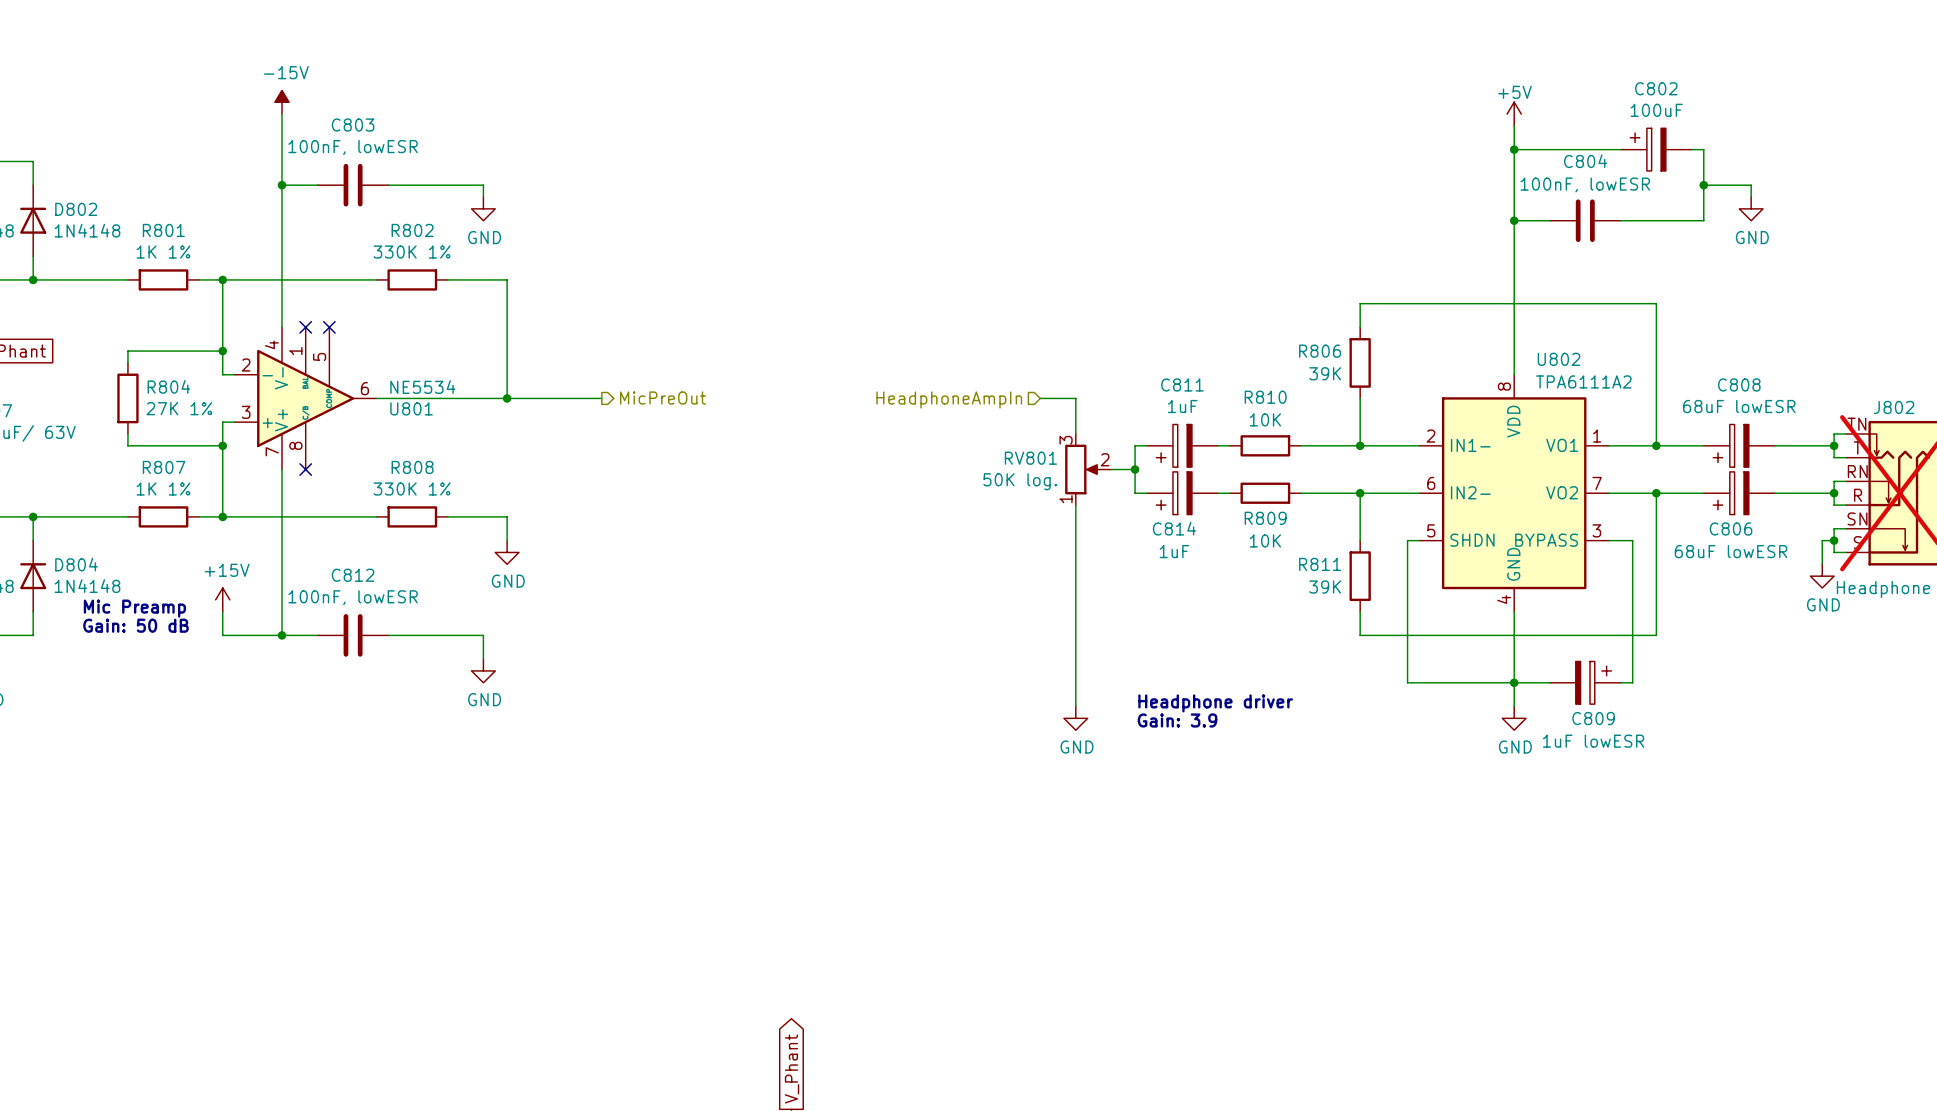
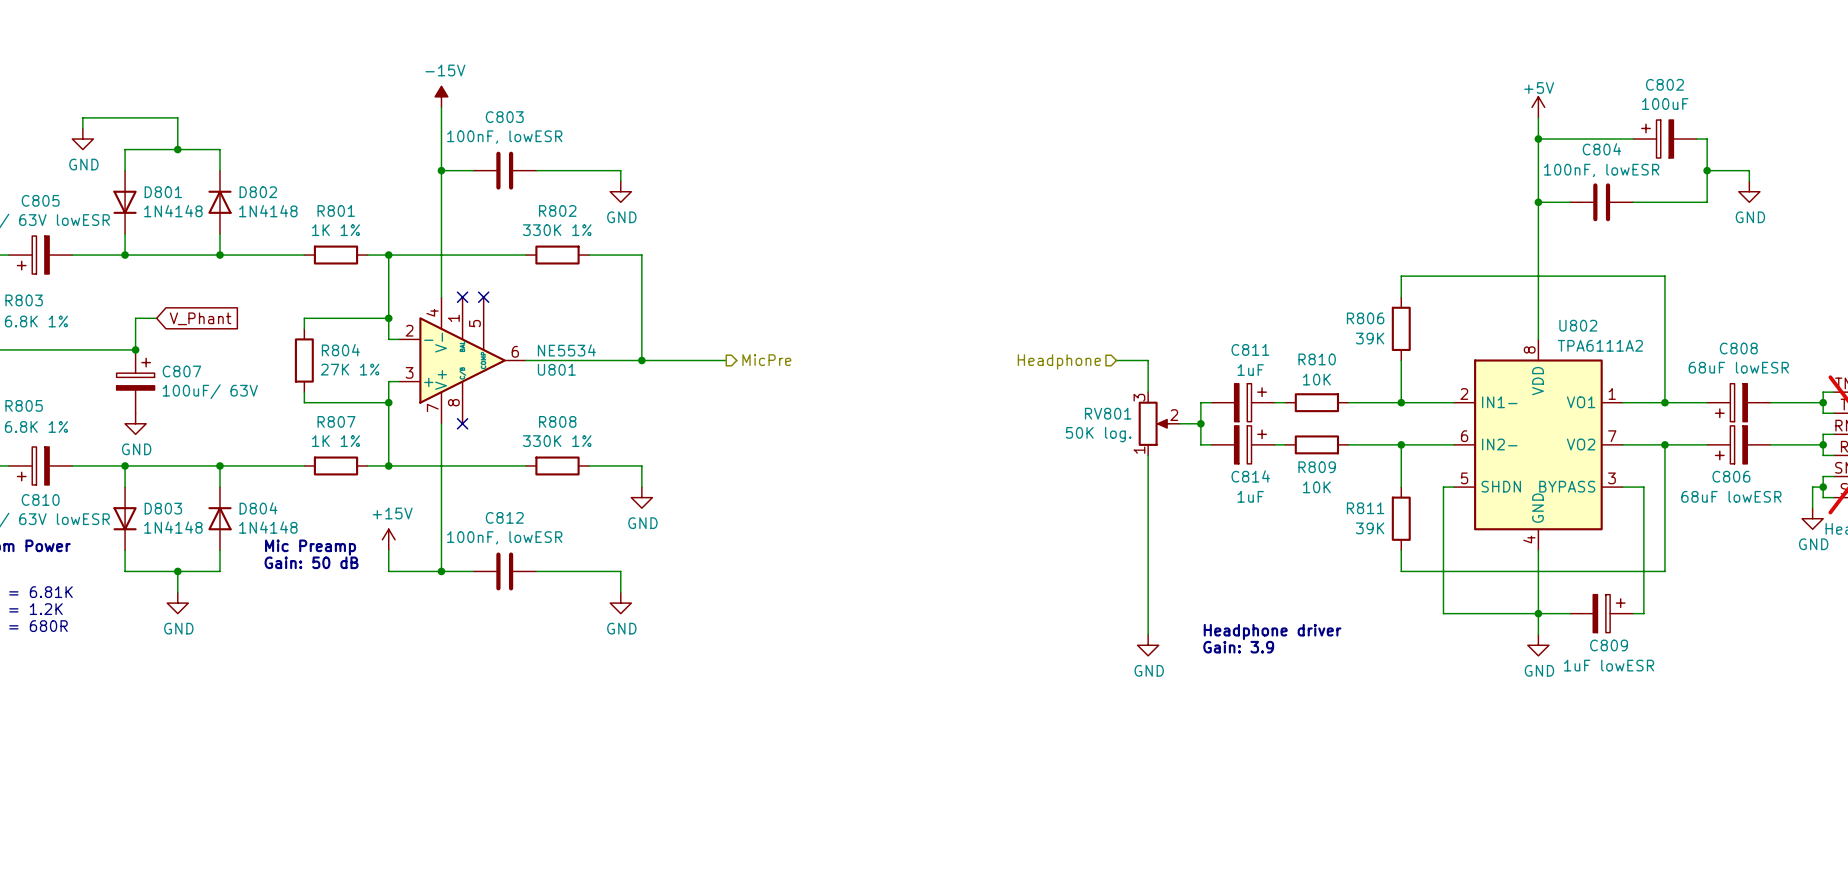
hierarchical label: MicPreOut (663, 398) -> MicPre (766, 360)
hierarchical label: HeadphoneAmpIn (949, 399) -> Headphone (1059, 361)
C811 rotation: 0° (1174, 445) -> 180° (1250, 402)
C814 rotation: 0° (1174, 493) -> 180° (1250, 444)

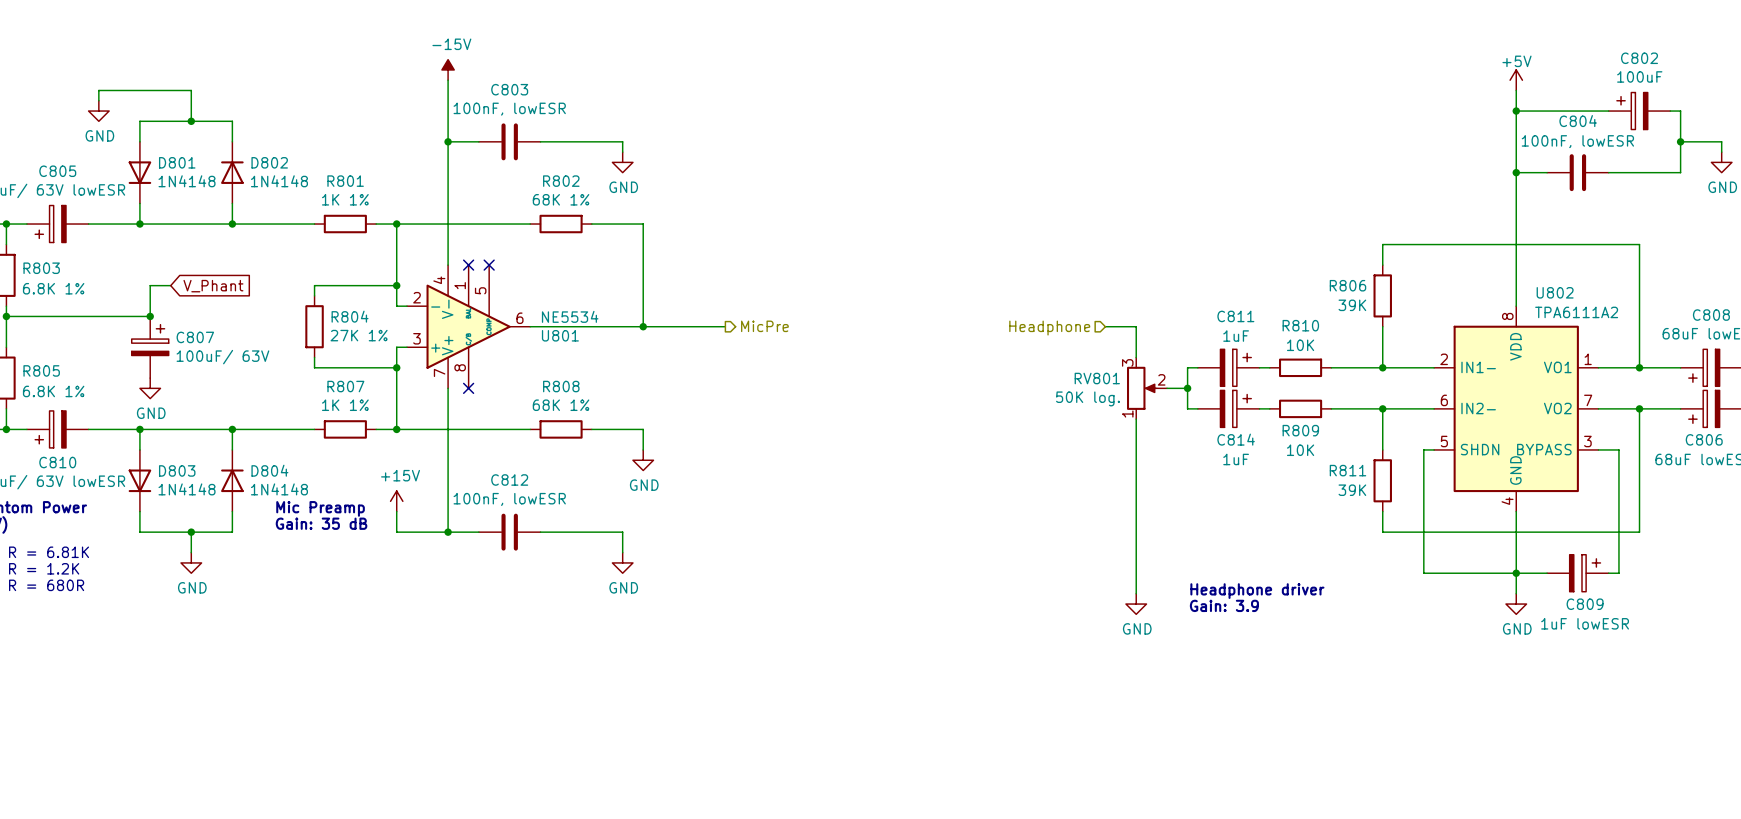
R802 value: 330K 1% (557, 230) -> 68K 1% (561, 199)
R808 value: 330K 1% (557, 441) -> 68K 1% (561, 405)
text: Gain: 50 dB (311, 562) -> Gain: 35 dB (321, 523)

